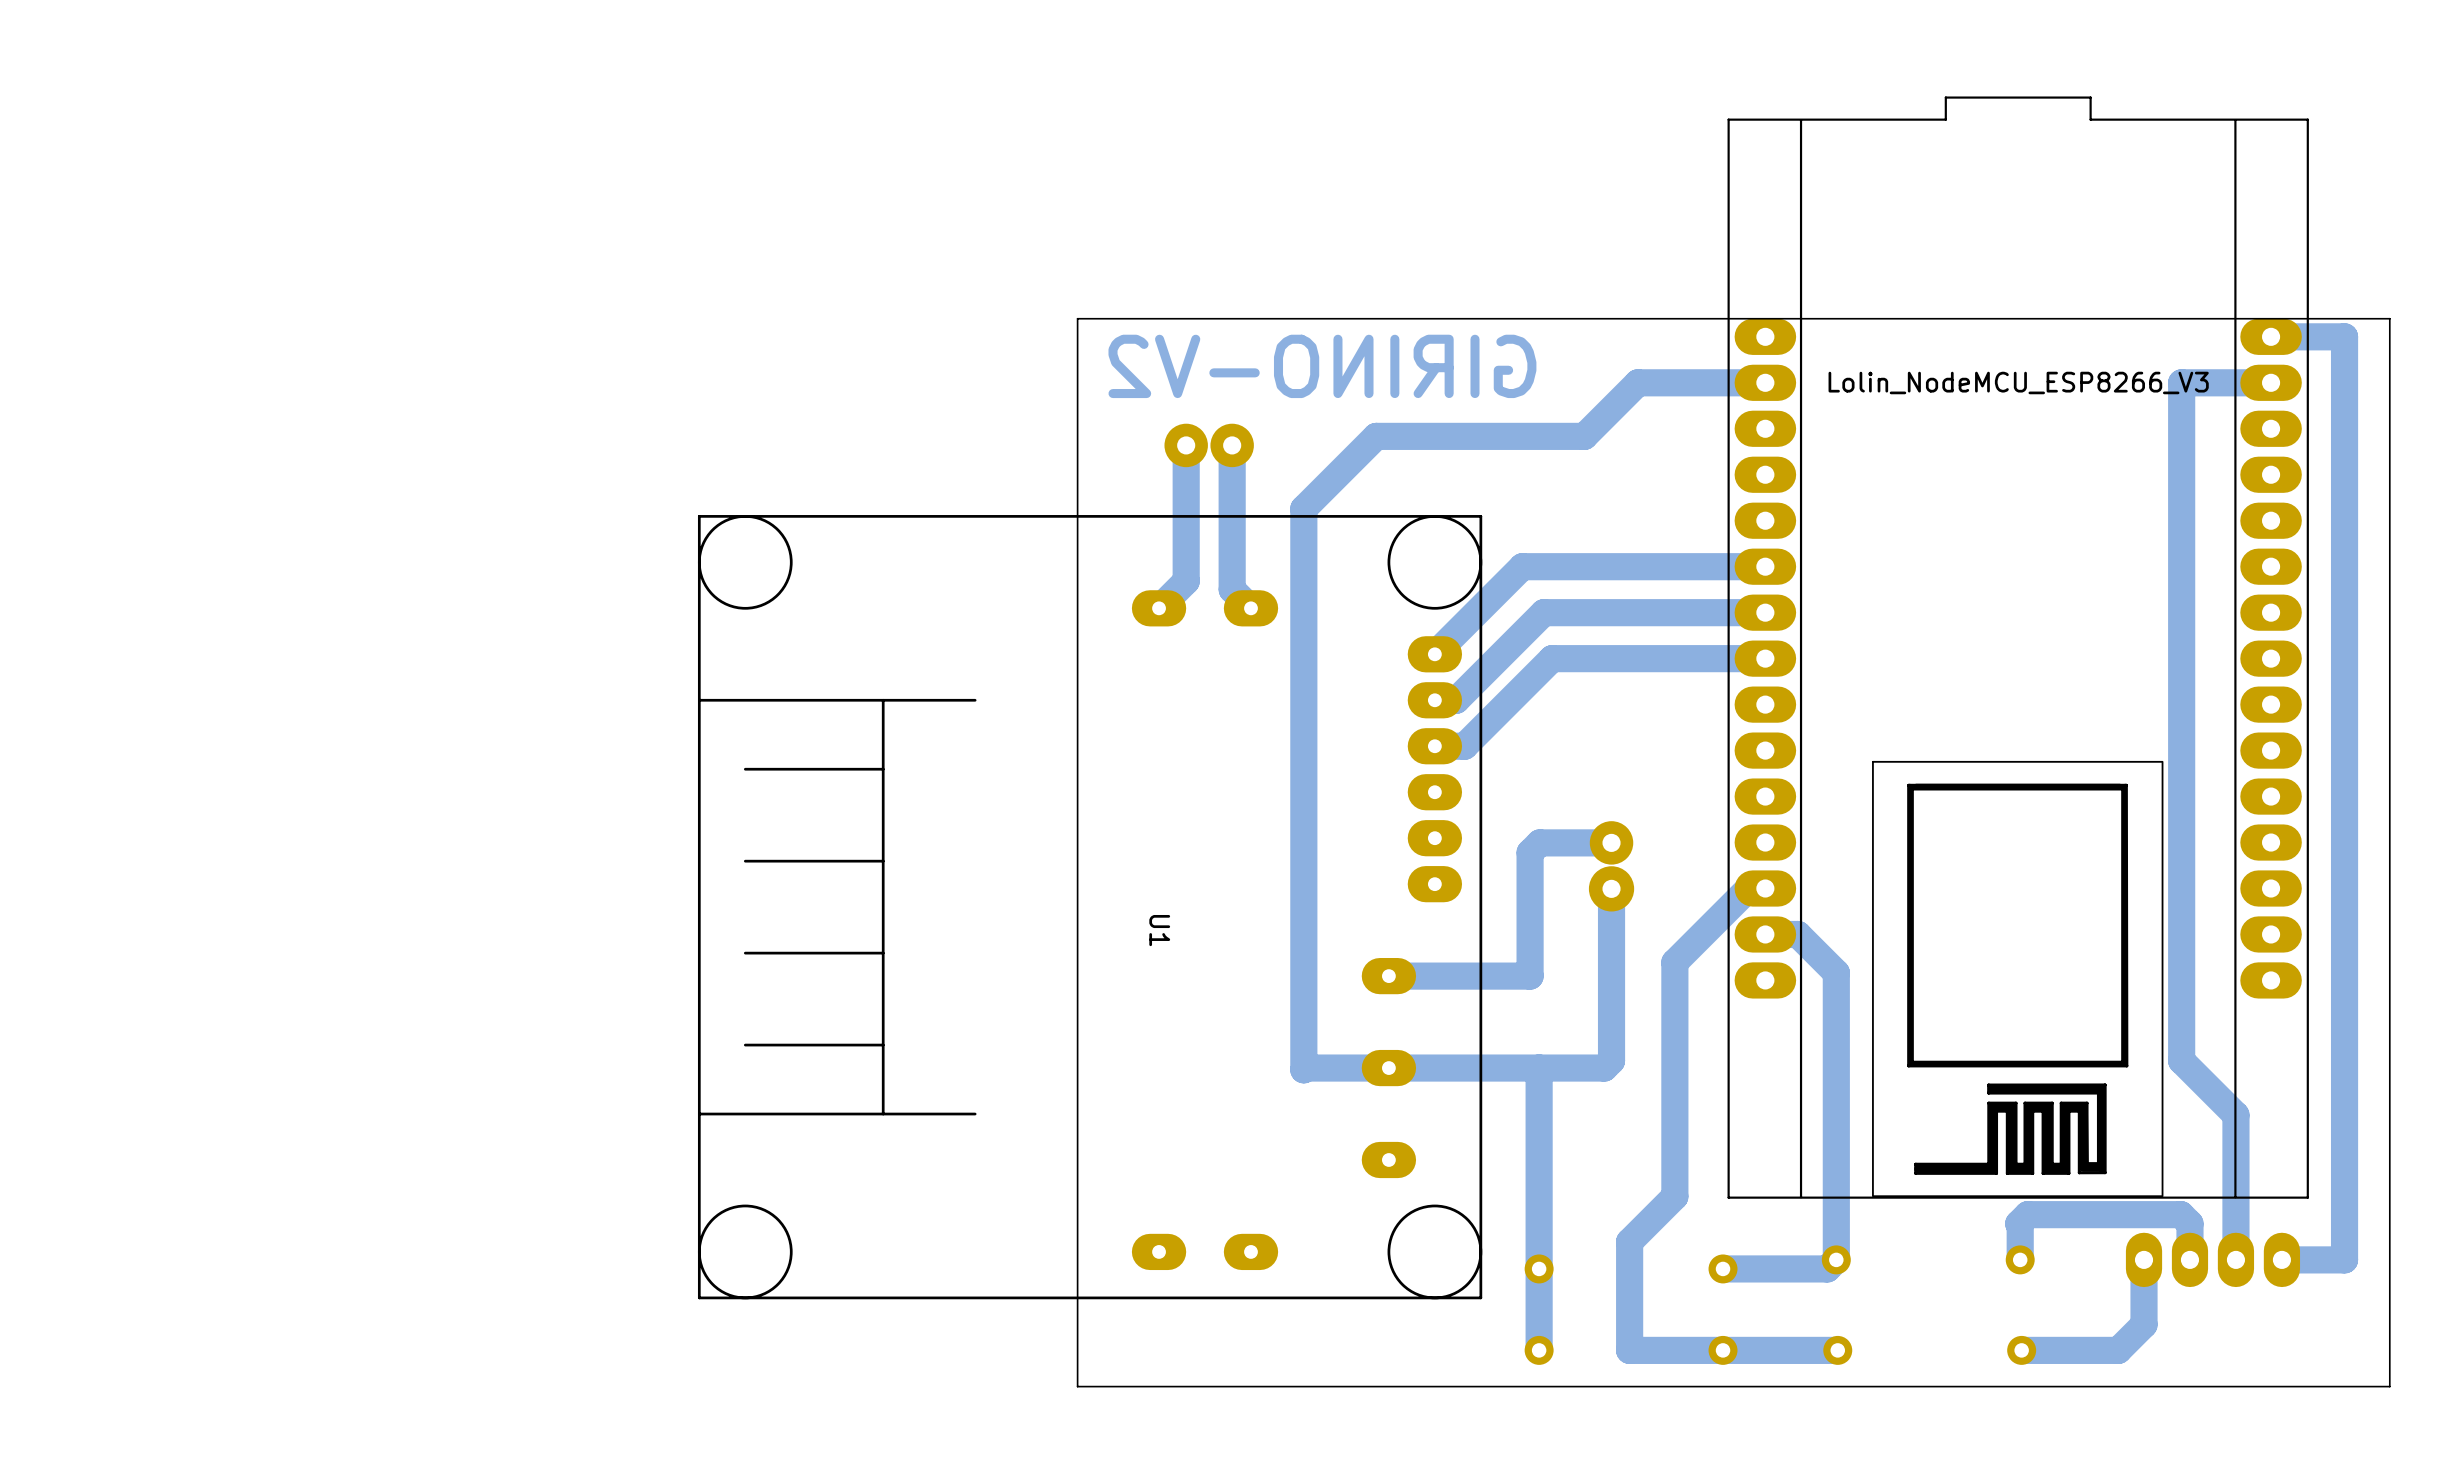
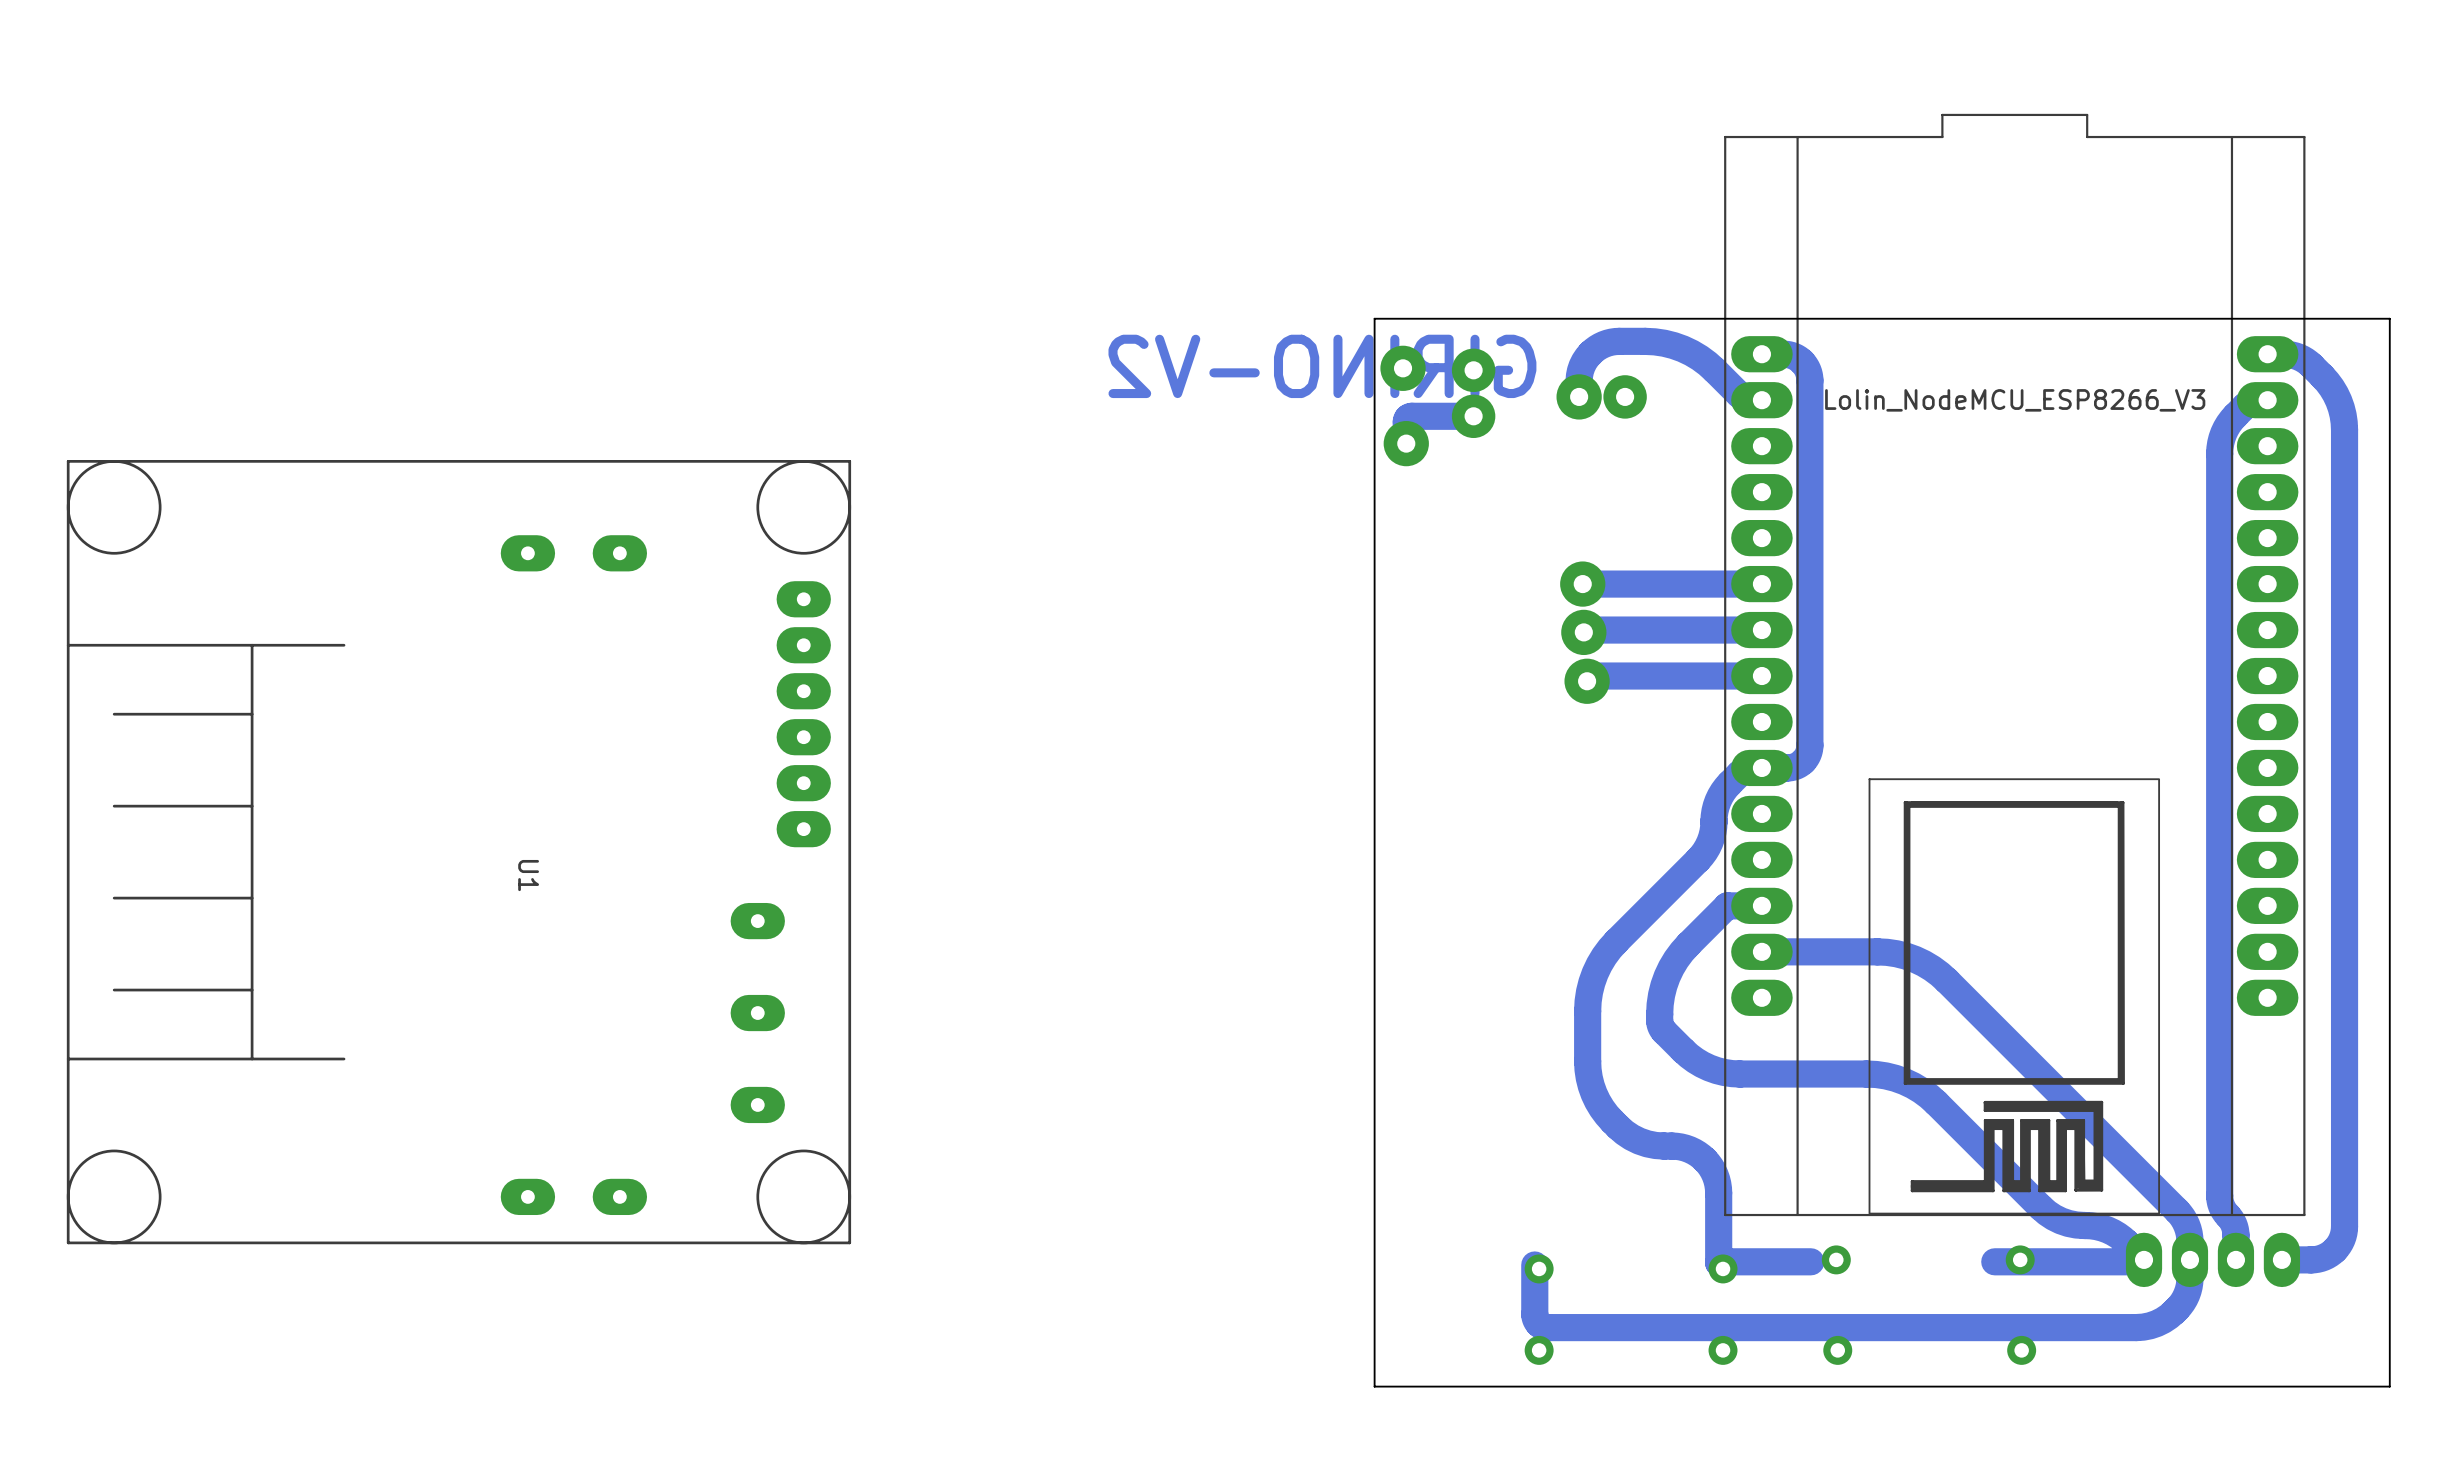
board edge: (1374, 318) (1077, 318) (1077, 1386) (1374, 1386) -> (1374, 318) (1374, 1386)
track: (2271, 336) (2344, 336) (2344, 429) -> (2267, 354) (2295, 355) (2311, 365) (2327, 381) (2335, 394) (2341, 407) (2344, 429)
track: none -> (1761, 354) (1786, 354) (1796, 357) (1805, 365) (1809, 377) (1809, 747) (1806, 757) (1795, 766) (1751, 768) (1740, 772) (1720, 796) (1716, 805) (1713, 821)
via: none -> (1403, 368)
track: (1765, 382) (1637, 382) (1584, 436) (1376, 436) (1303, 508) (1303, 1069) (1305, 1068) (1604, 1068) (1611, 1060) (1611, 888) -> none
track: (2271, 382) (2181, 382) (2181, 1060) (2235, 1115) (2235, 1235) -> (2267, 400) (2249, 402) (2231, 419) (2221, 438) (2219, 453) (2219, 1195) (2223, 1209) (2233, 1224) (2235, 1235)
track: none -> (1579, 396) (1580, 370) (1584, 361) (1593, 350) (1611, 342) (1645, 341) (1664, 343) (1691, 352) (1707, 363) (1740, 395) (1747, 399) (1761, 400)
part: none -> (1601, 396)
track: none -> (1473, 416) (1409, 416) (1406, 421) (1406, 443)
via: none -> (1406, 443)
track: (1186, 445) (1186, 581) (1159, 608) -> none
part rotation: 0° (1209, 445) -> 90° clockwise (1473, 393)
part position: (1209, 445) -> (1473, 393)
track: (1232, 445) (1232, 589) (1250, 608) -> none
track: (1765, 566) (1522, 566) (1434, 654) -> none
via: none -> (1582, 584)
track: none -> (1761, 584) (1582, 584)
track: (1765, 612) (1543, 612) (1456, 700) (1434, 700) -> none
track: none -> (1761, 630) (1587, 630) (1583, 632)
via: none -> (1583, 632)
part position: (2018, 647) -> (2014, 664)
track: (1765, 658) (1552, 658) (1464, 746) (1434, 746) -> none
track: none -> (1761, 676) (1596, 676) (1587, 681)
via: none -> (1587, 681)
track: none -> (1713, 821) (1709, 842) (1701, 855) (1616, 941) (1599, 964) (1591, 982) (1588, 1001) (1589, 1077) (1594, 1093) (1601, 1108) (1624, 1132) (1647, 1143) (1676, 1146) (1689, 1149) (1701, 1156) (1710, 1166) (1718, 1188) (1719, 1263) (1724, 1261) (1810, 1261)
track: (1611, 842) (1539, 842) (1530, 852) (1530, 976) (1388, 976) -> none
part: (1611, 866) -> none
track: (1765, 888) (1748, 888) (1674, 962) (1674, 1196) (1629, 1241) (1629, 1350) (1837, 1350) -> none
track: none -> (1761, 905) (1727, 905) (1682, 951) (1671, 967) (1663, 985) (1659, 1014) (1662, 1029) (1695, 1060) (1709, 1067) (1724, 1072) (1876, 1074) (1895, 1078) (1913, 1085) (1936, 1102) (2047, 1212) (2068, 1223) (2096, 1226) (2112, 1232) (2122, 1238) (2143, 1259) (2140, 1261) (1994, 1261)
U1 position: (1090, 907) -> (458, 852)
track: (1765, 934) (1797, 934) (1836, 972) (1836, 1259) (1827, 1268) (1723, 1268) -> none
track: (1539, 1068) (1539, 1350) -> none
track: (2344, 1226) (2344, 1259) (2311, 1259) -> (2344, 1226) (2342, 1239) (2334, 1250) (2323, 1257) (2311, 1259)
track: (2189, 1241) (2189, 1223) (2180, 1214) (2027, 1214) (2018, 1223) (2020, 1259) -> (2189, 1241) (2186, 1225) (2177, 1210) (1946, 980) (1932, 968) (1905, 956) (1886, 952) (1761, 951)
track: (2144, 1259) (2144, 1324) (2118, 1350) (2021, 1350) -> none
track: none -> (2189, 1259) (2189, 1286) (2180, 1305) (2163, 1320) (2150, 1325) (2136, 1327) (1546, 1327) (1538, 1323) (1534, 1316) (1534, 1264)

